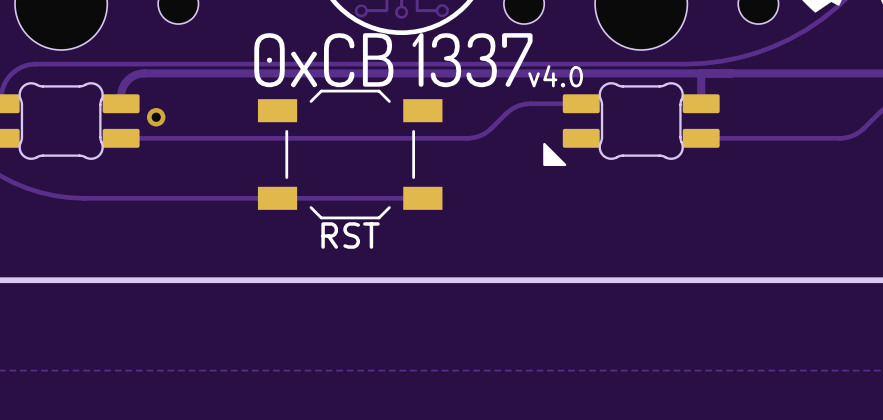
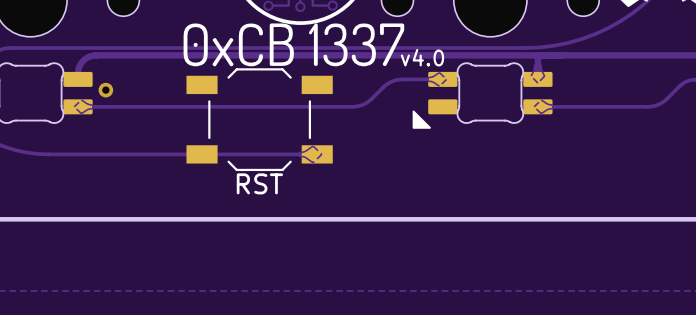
zone outline: none -> (541, 64) (544, 76) (537, 83) (531, 76) (534, 64) (541, 64)
zone outline: none -> (439, 72) (428, 77) (428, 81) (439, 86) (446, 79) (439, 72)
zone outline: none -> (81, 100) (74, 106) (81, 113) (92, 108) (92, 105) (81, 100)
zone outline: none -> (541, 100) (534, 106) (541, 113) (552, 108) (552, 105) (541, 100)
zone outline: none -> (313, 146) (299, 152) (299, 156) (313, 162) (321, 154) (313, 146)

